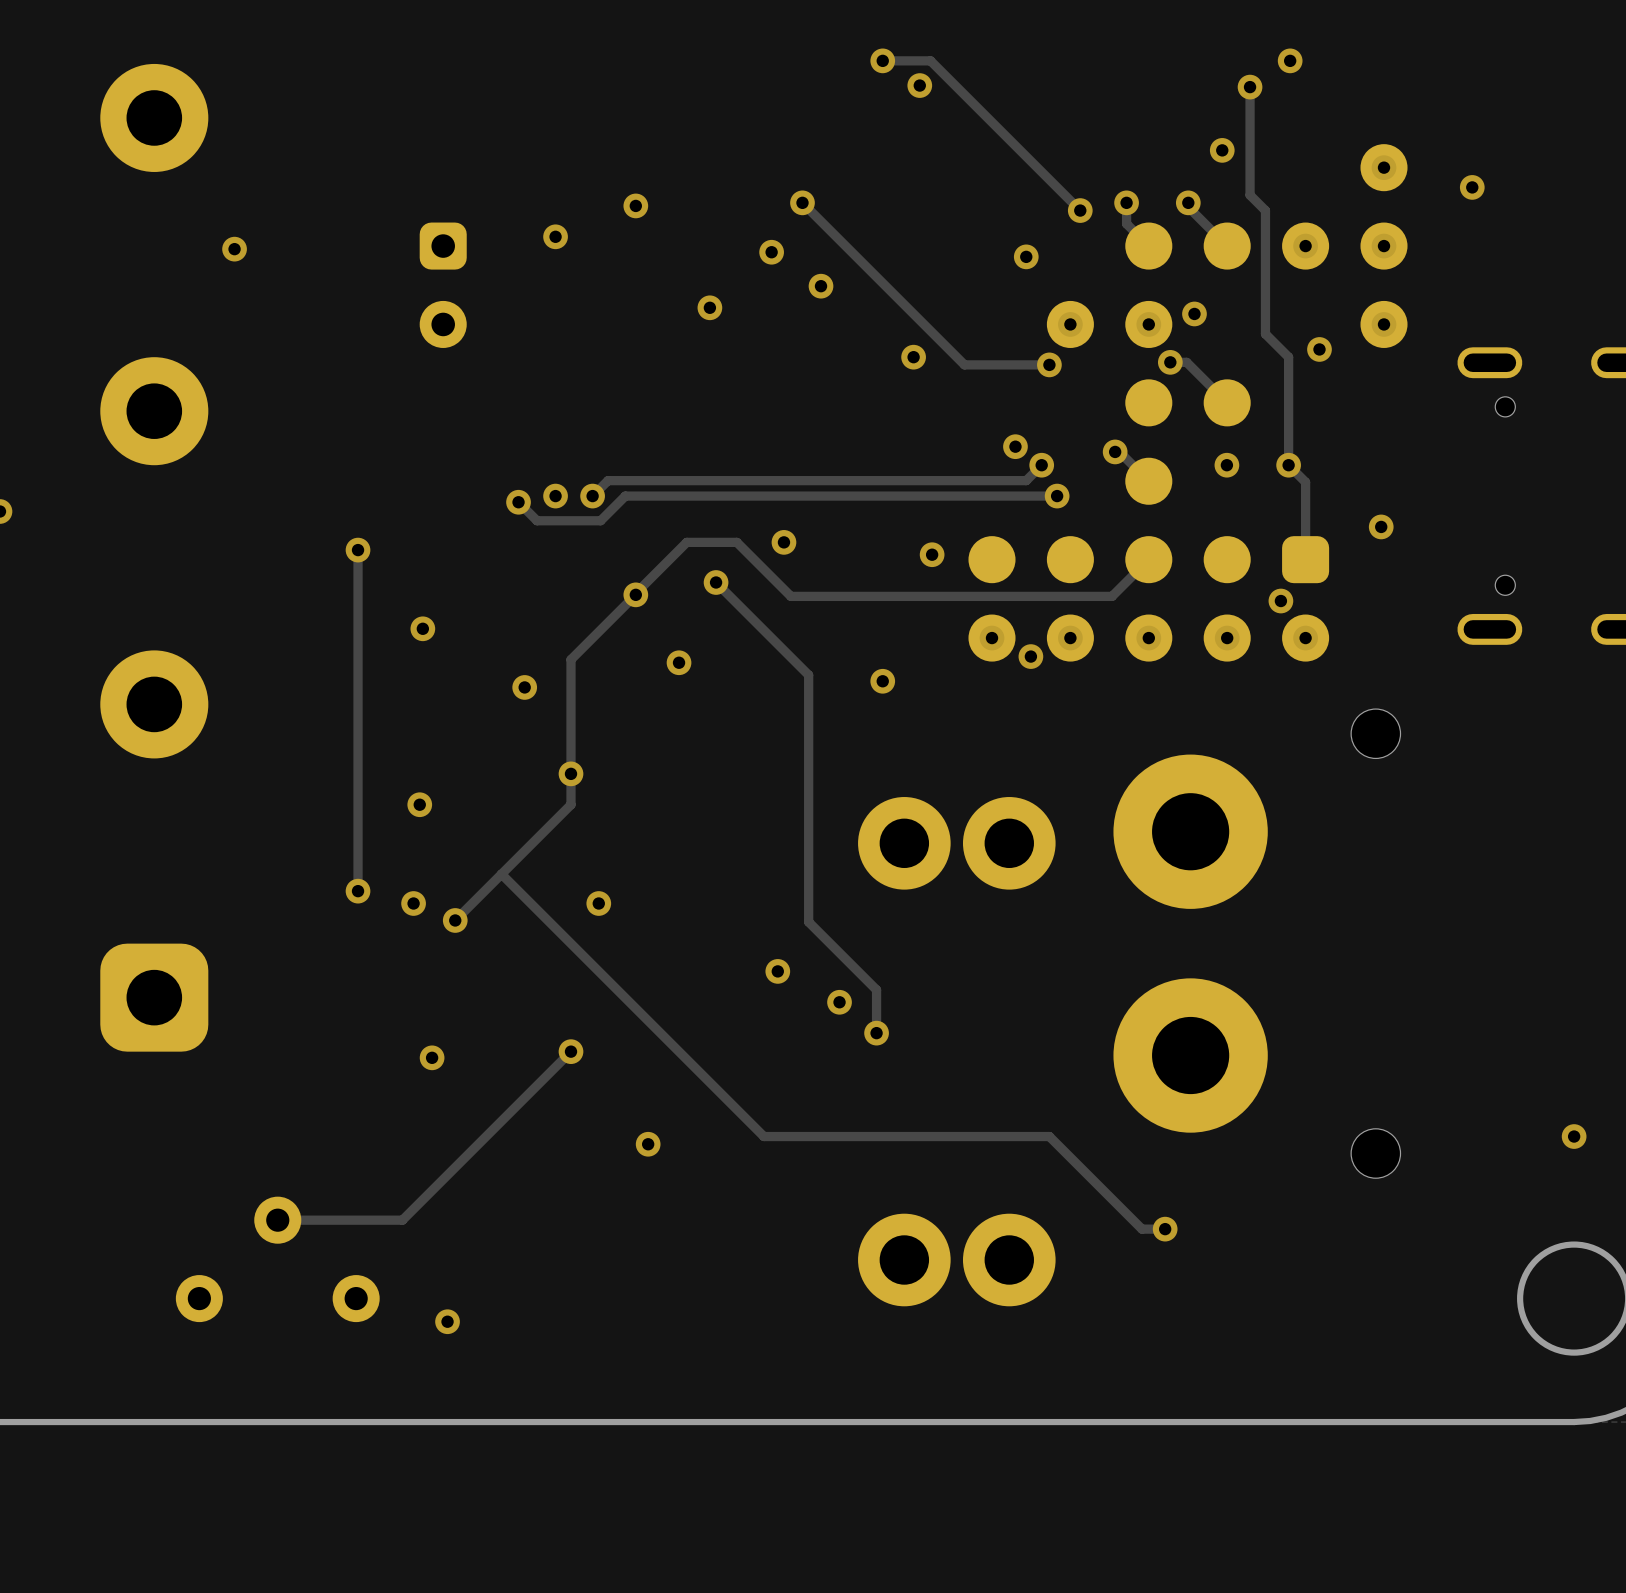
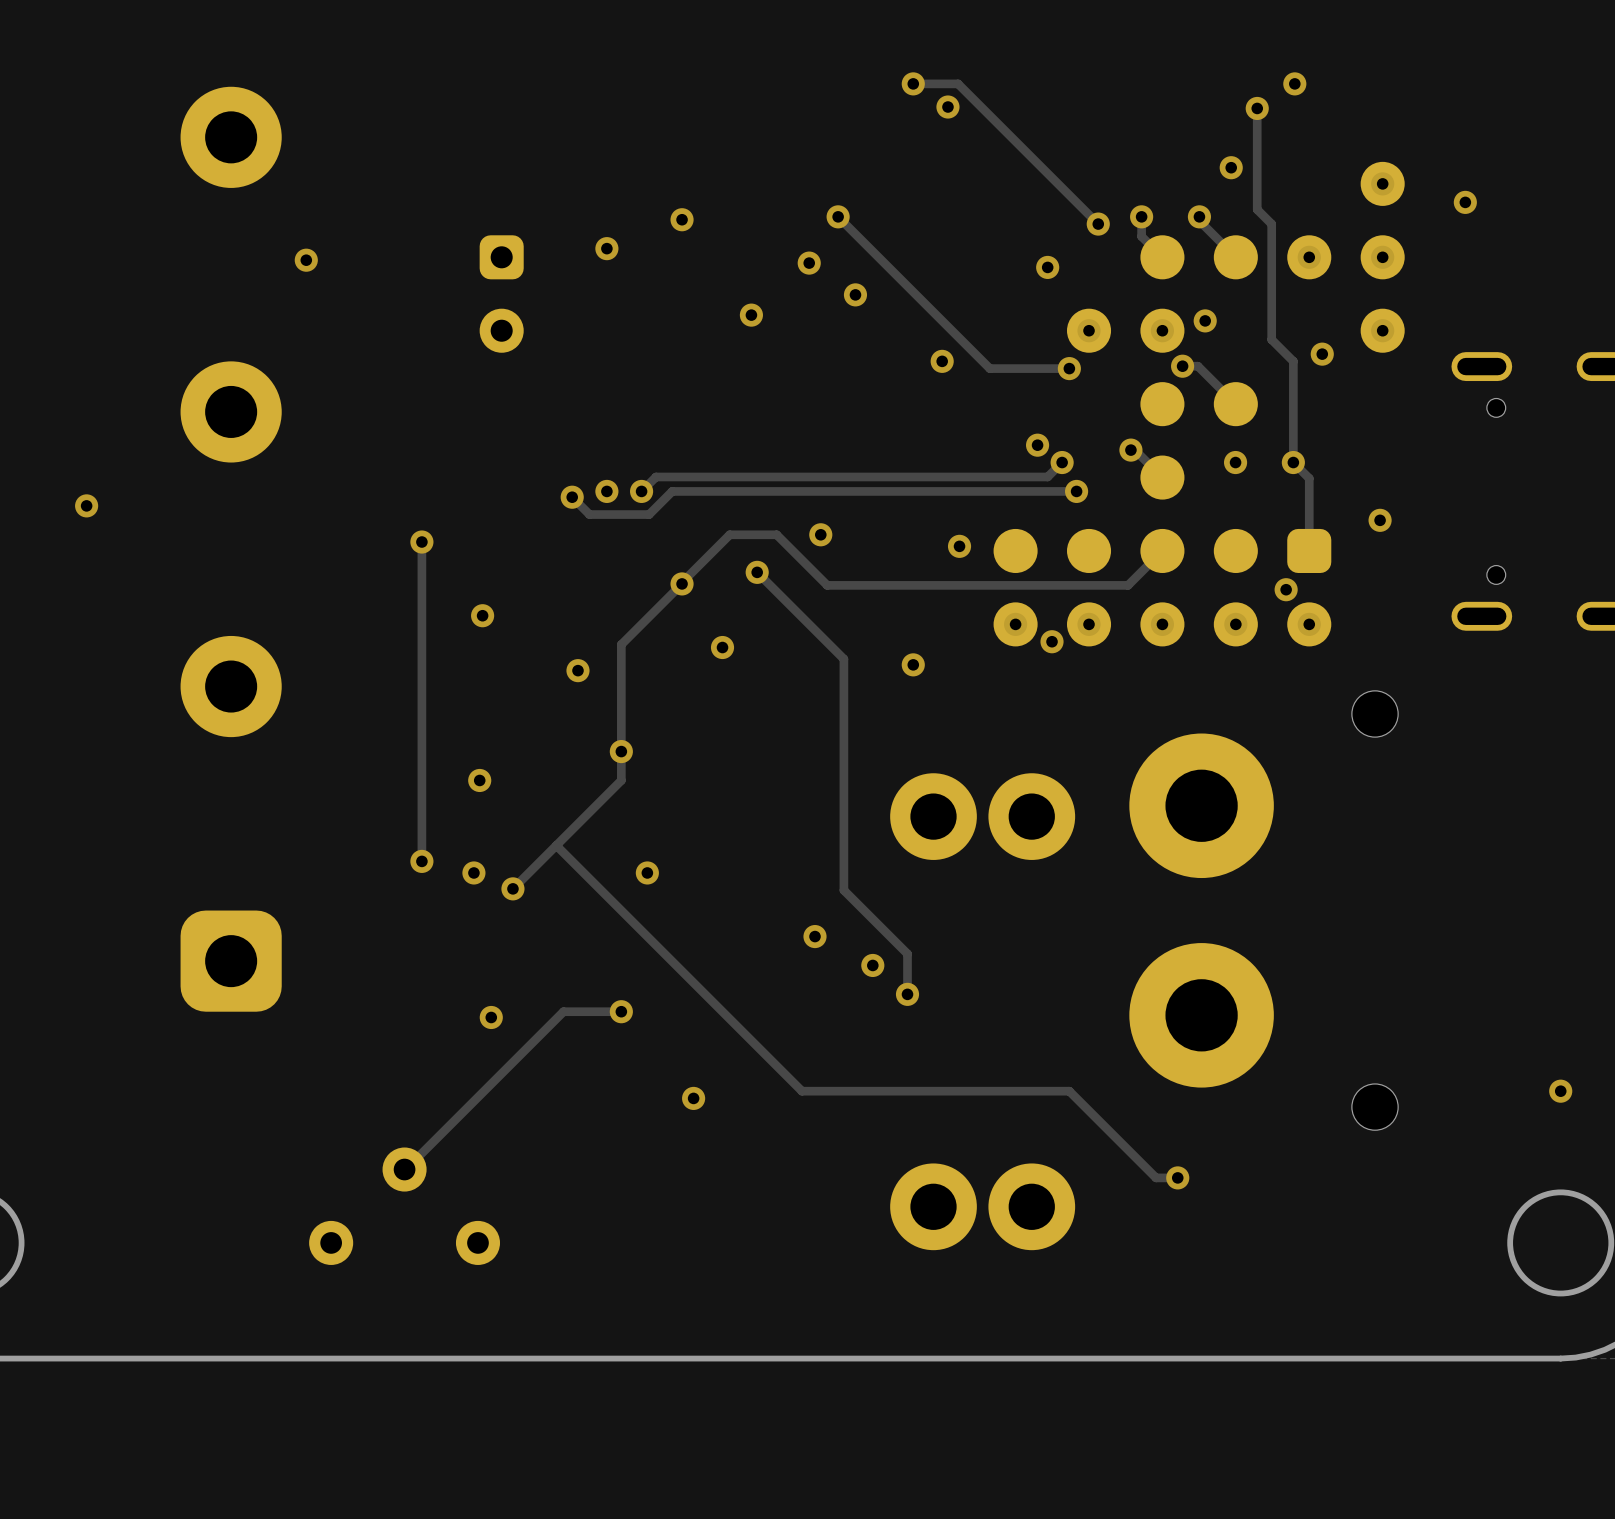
track: (570, 1051) (402, 1220) (340, 1220) -> (621, 1011) (563, 1011) (405, 1169)
track: (339, 1220) (277, 1220) -> none
part position: (277, 1259) -> (404, 1206)
via: (447, 1321) -> none

